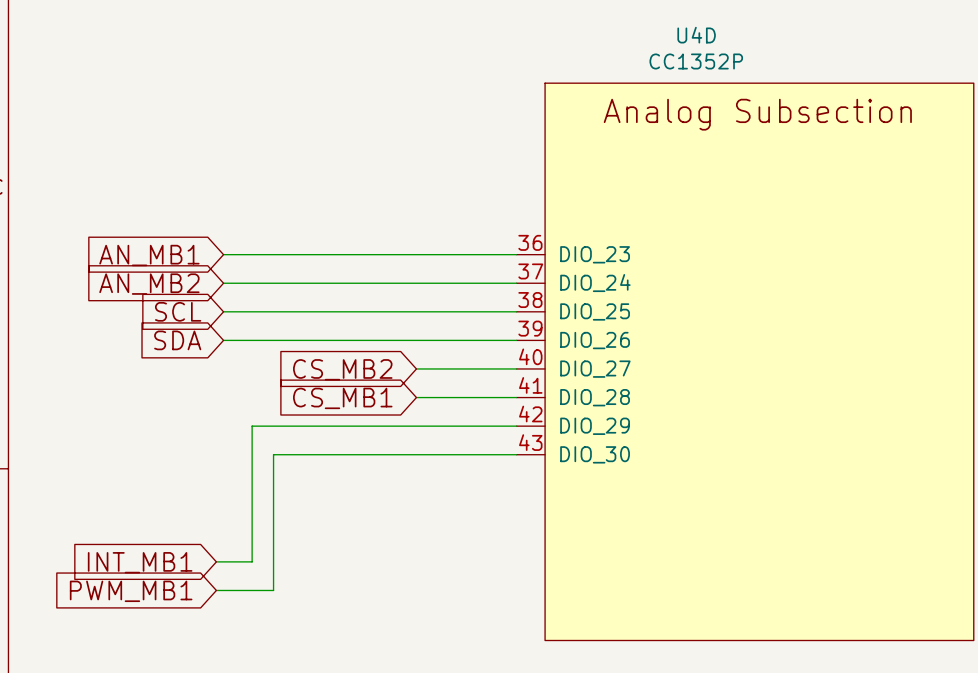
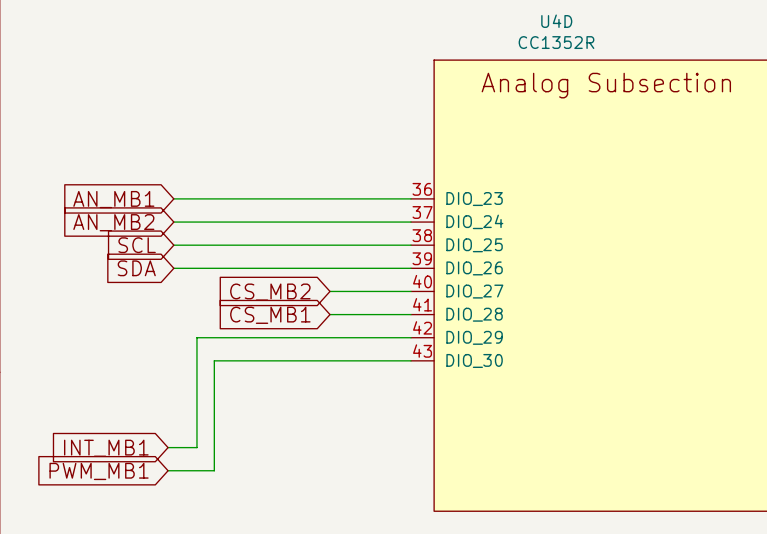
U4D value: CC1352P (696, 61) -> CC1352R (556, 42)

